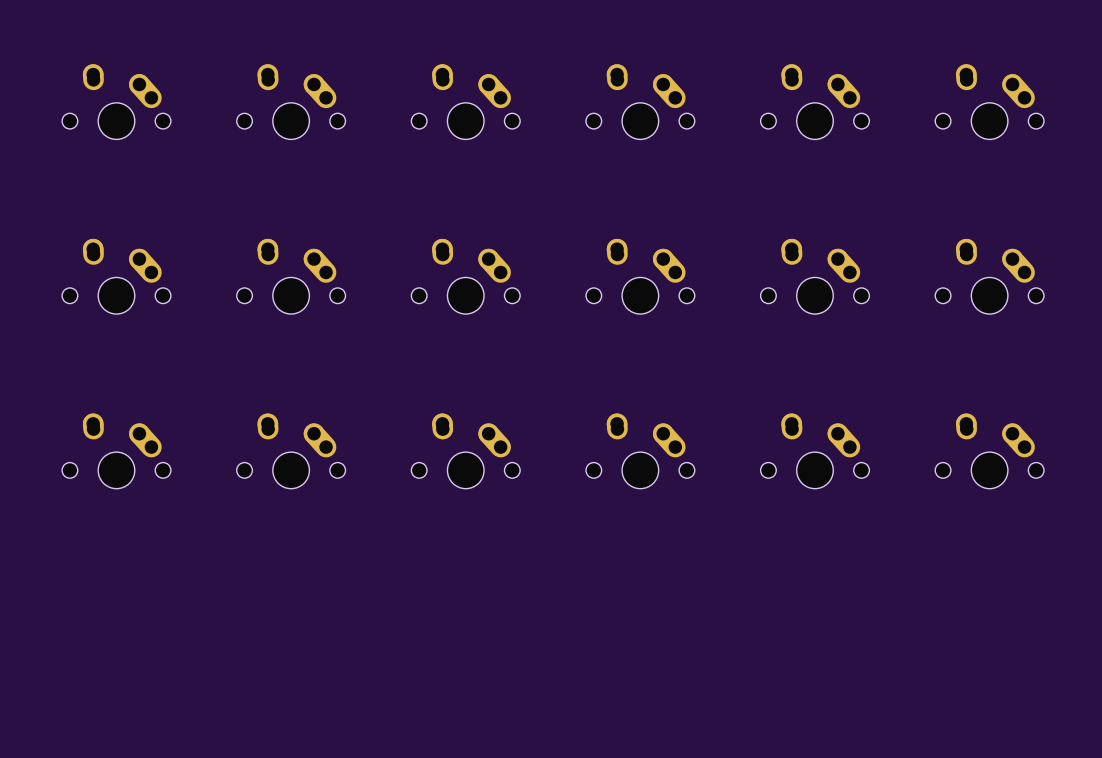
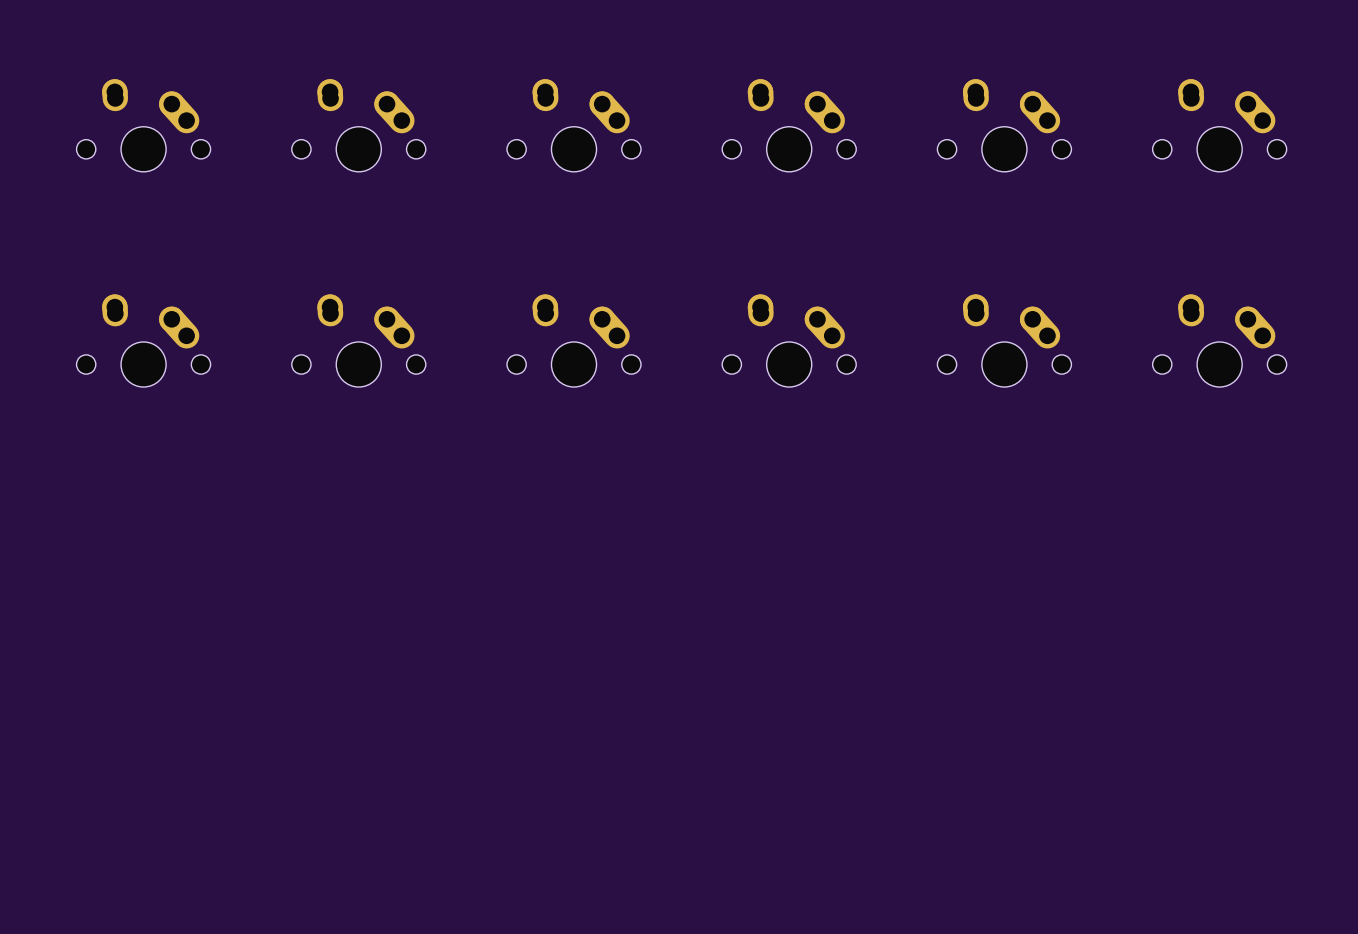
part: (116, 451) -> none
part: (291, 451) -> none
part: (465, 451) -> none
part: (640, 451) -> none
part: (814, 451) -> none
part: (989, 451) -> none

